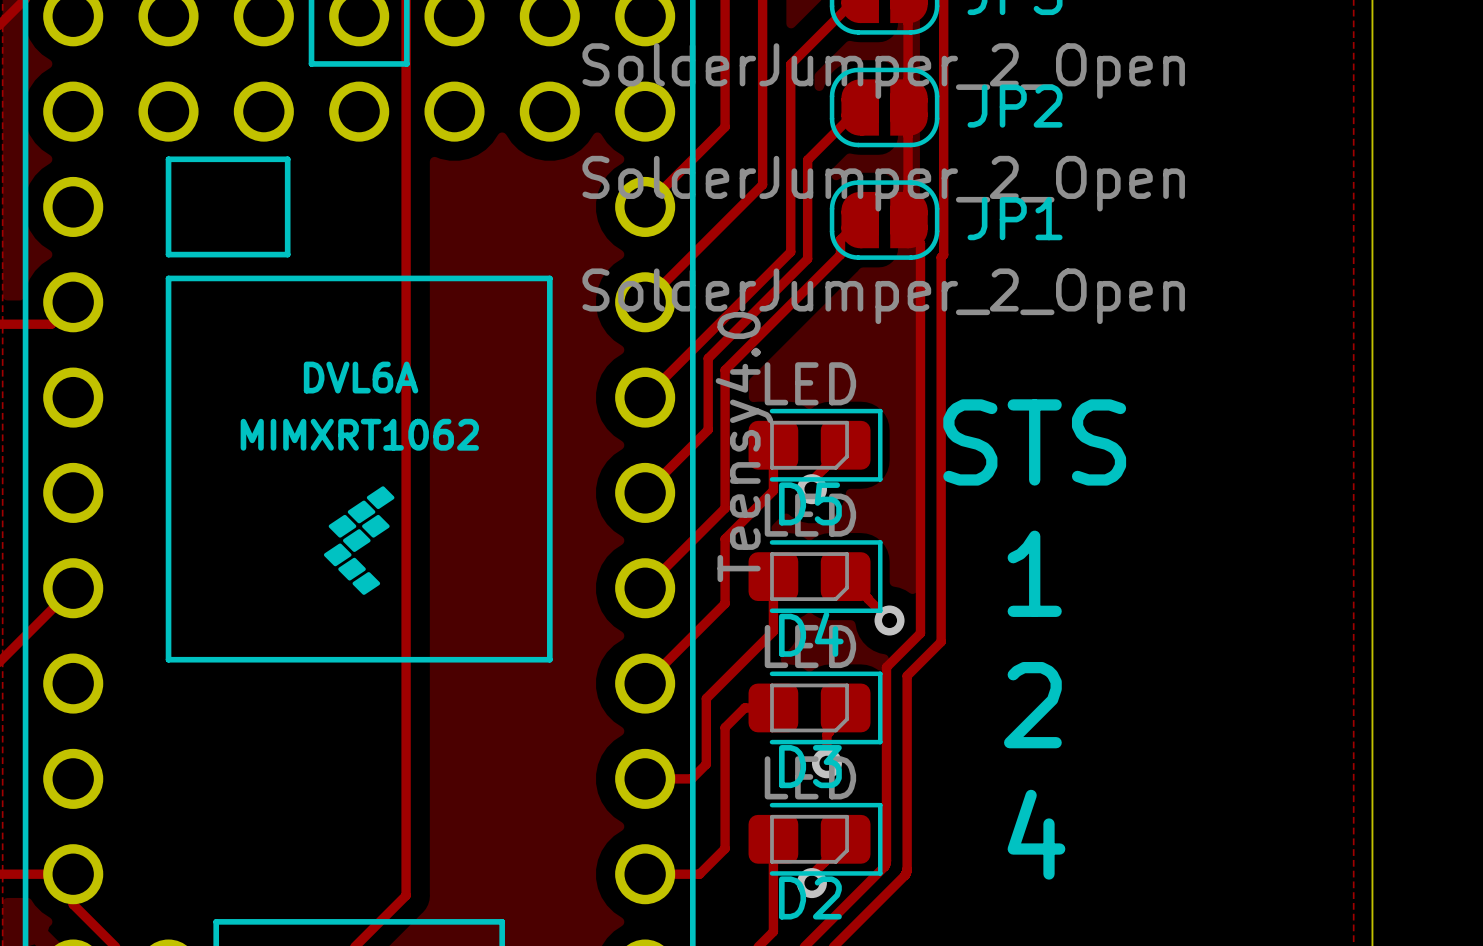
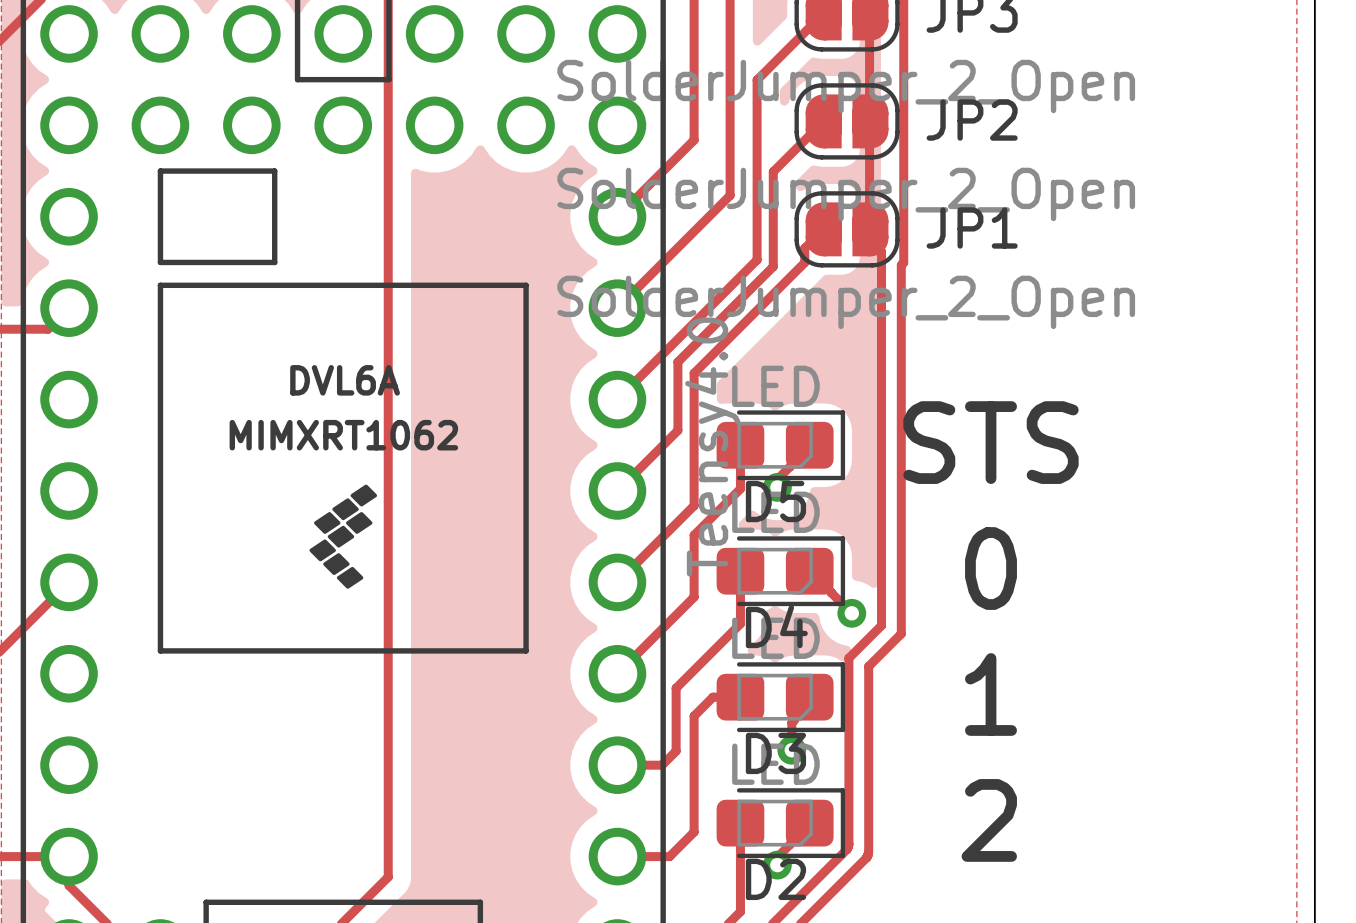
text: 1 (1034, 573) -> 0 (991, 568)
text: 2 (1032, 705) -> 1 (991, 694)
text: 4 (1036, 834) -> 2 (989, 820)

